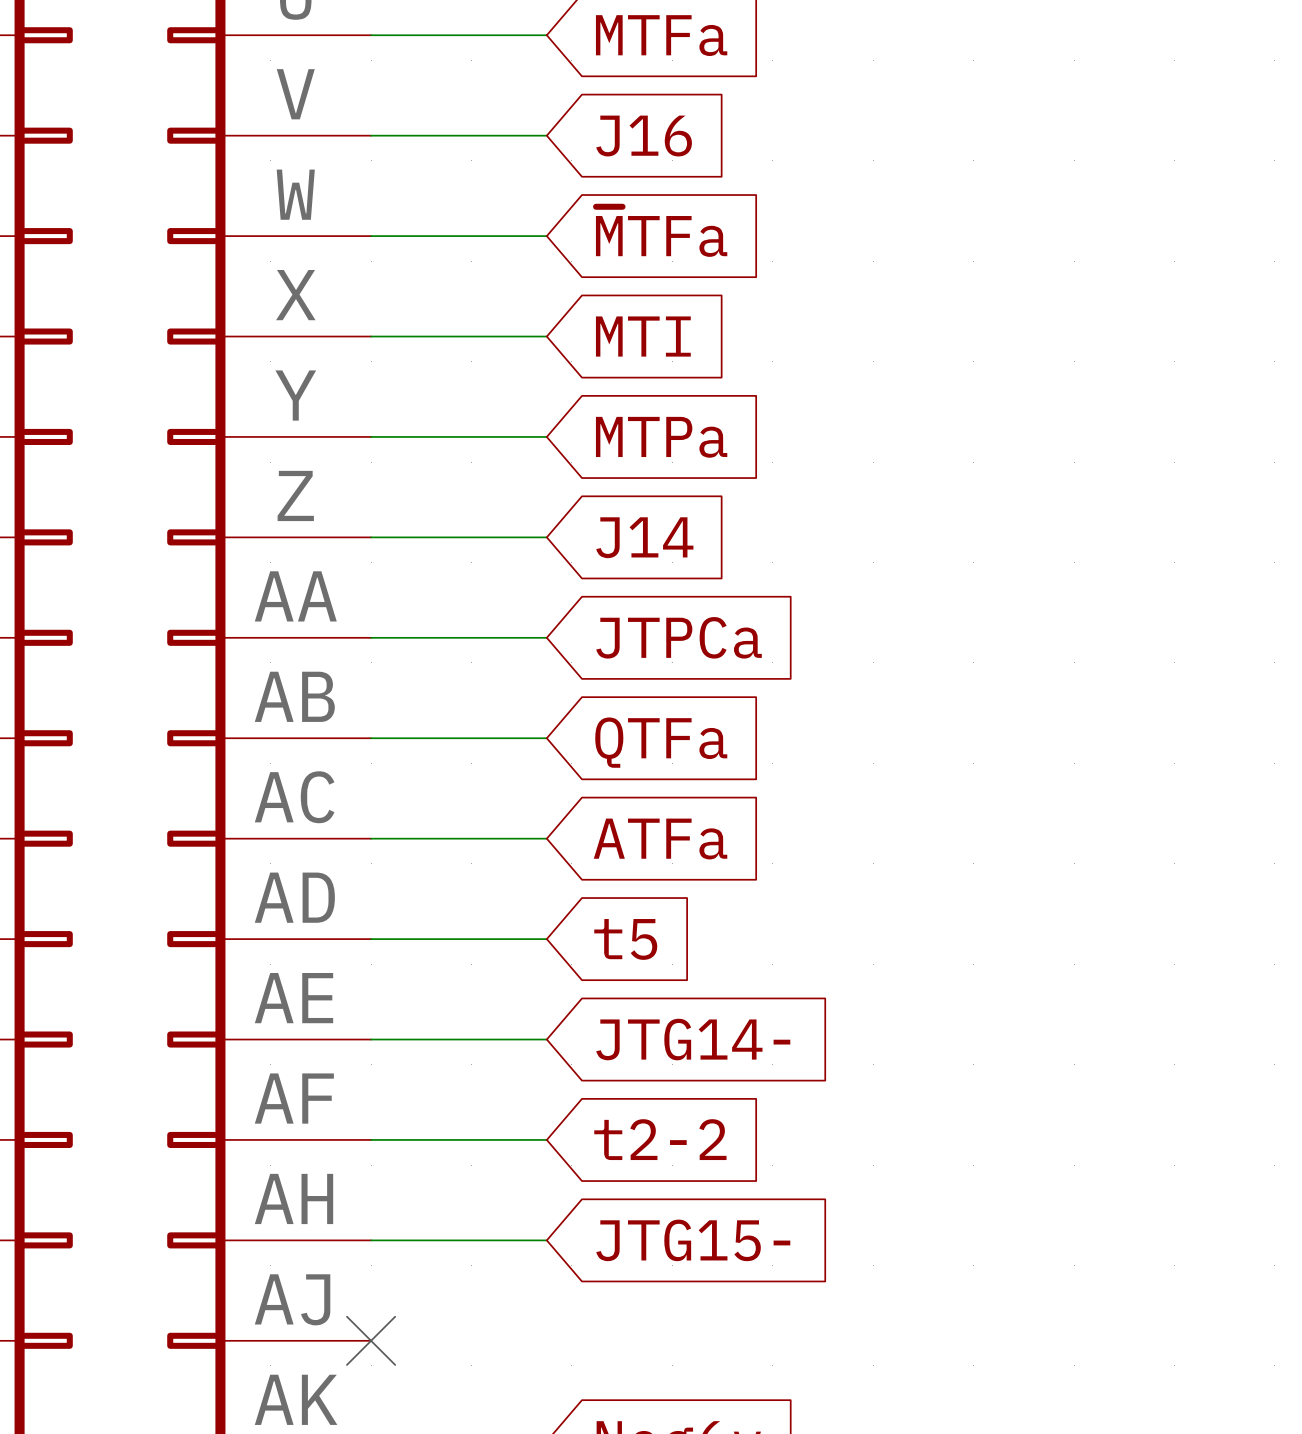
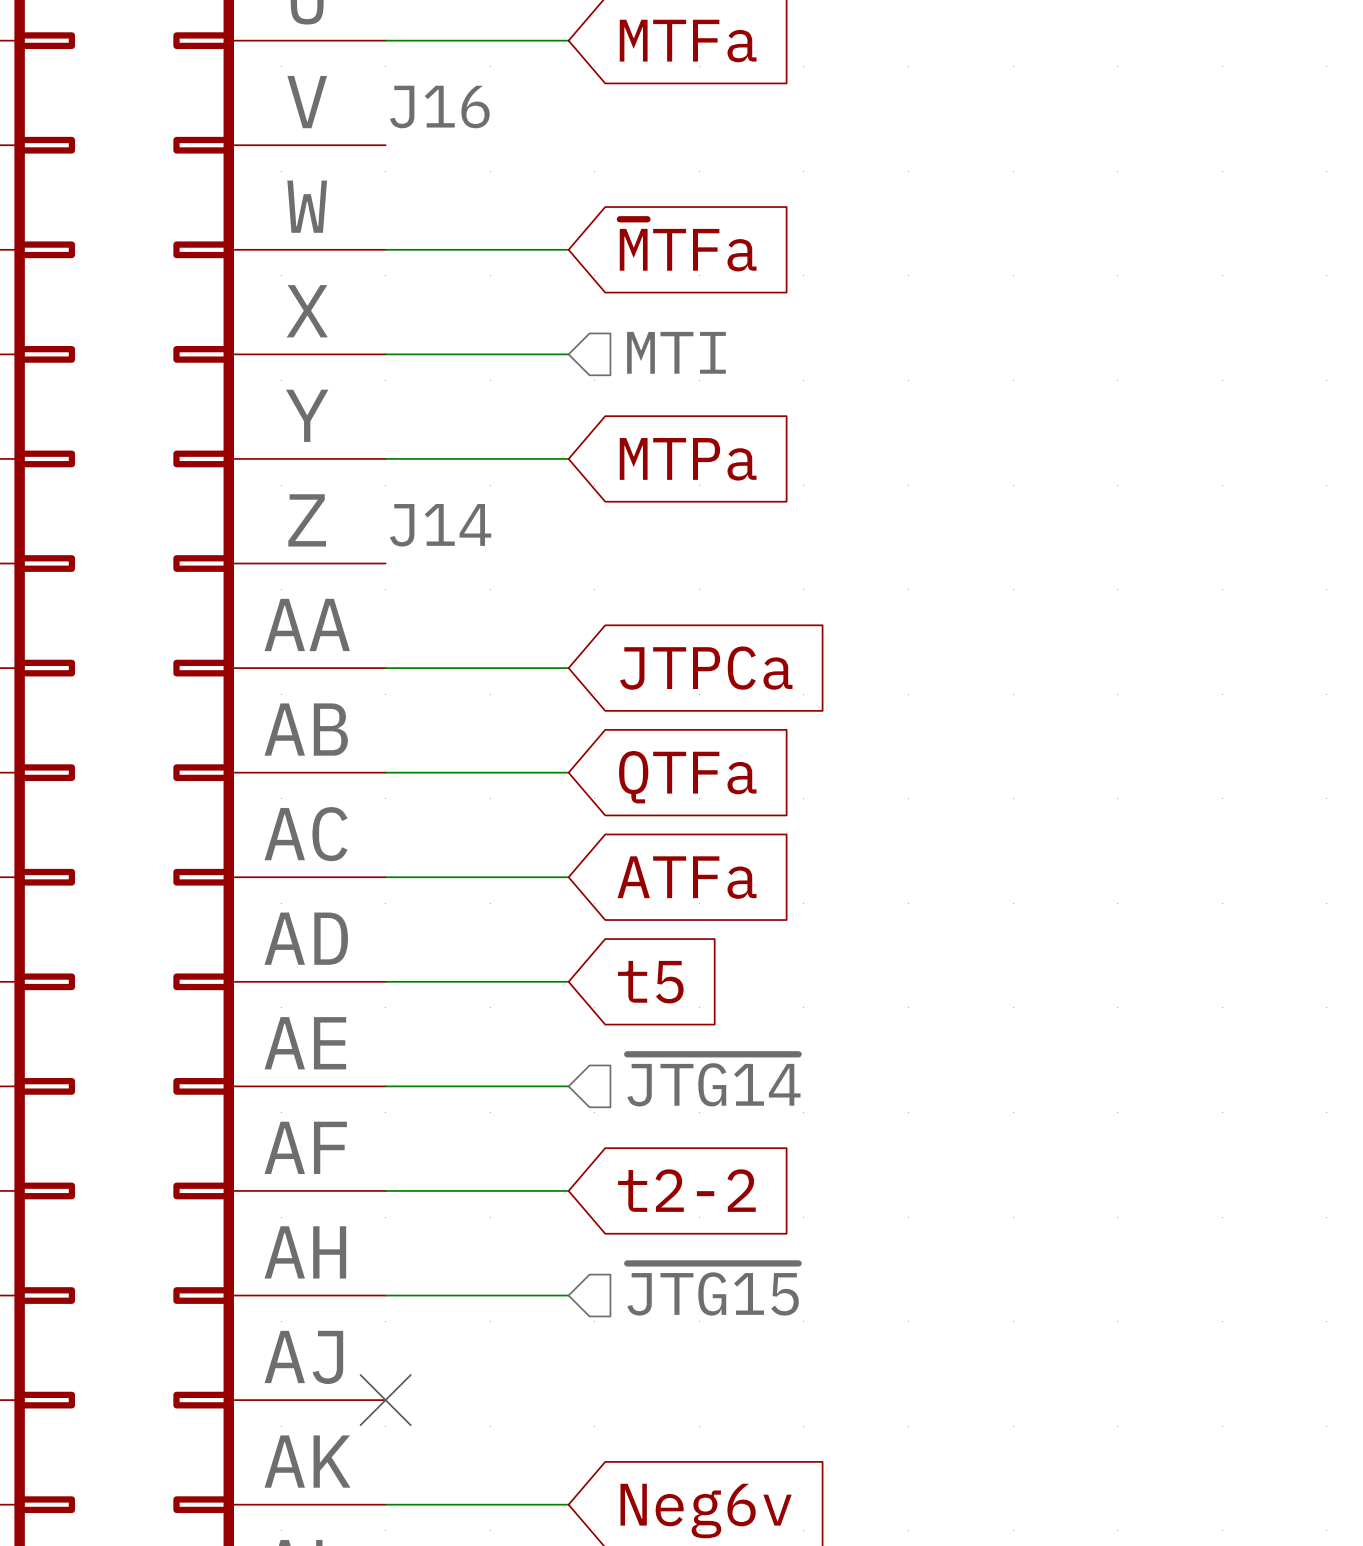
label: none -> J16 (439, 107)
wire: (371, 135) (546, 135) -> none
global label: J16 (644, 136) -> none
hierarchical label: none -> MTI (676, 352)
global label: MTI (643, 336) -> none
label: none -> J14 (440, 525)
wire: (371, 537) (546, 537) -> none
global label: J14 (644, 537) -> none
hierarchical label: none -> ~{JTG14} (713, 1080)
global label: JTG14- (693, 1039) -> none
hierarchical label: none -> ~{JTG15} (712, 1289)
global label: JTG15- (693, 1240) -> none

